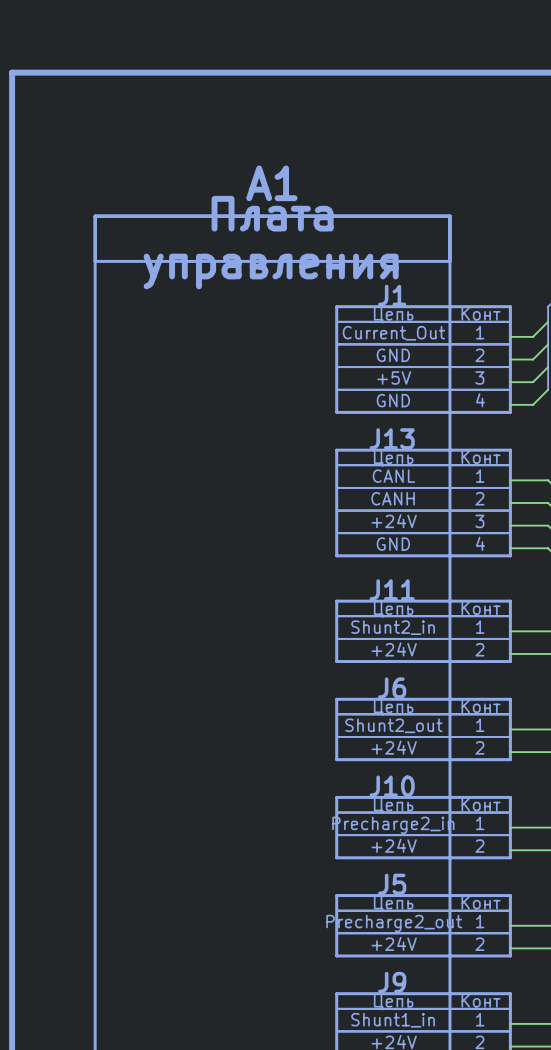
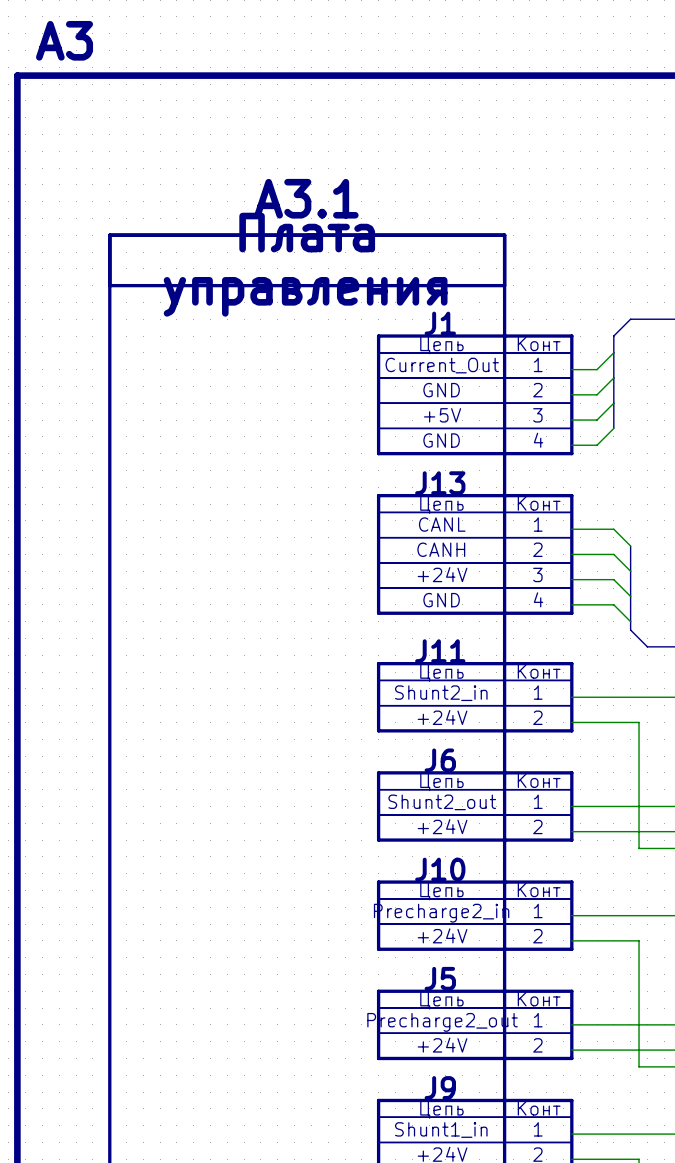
text: none -> А3 (64, 40)
text: А1 (271, 183) -> А3.1 (306, 198)

